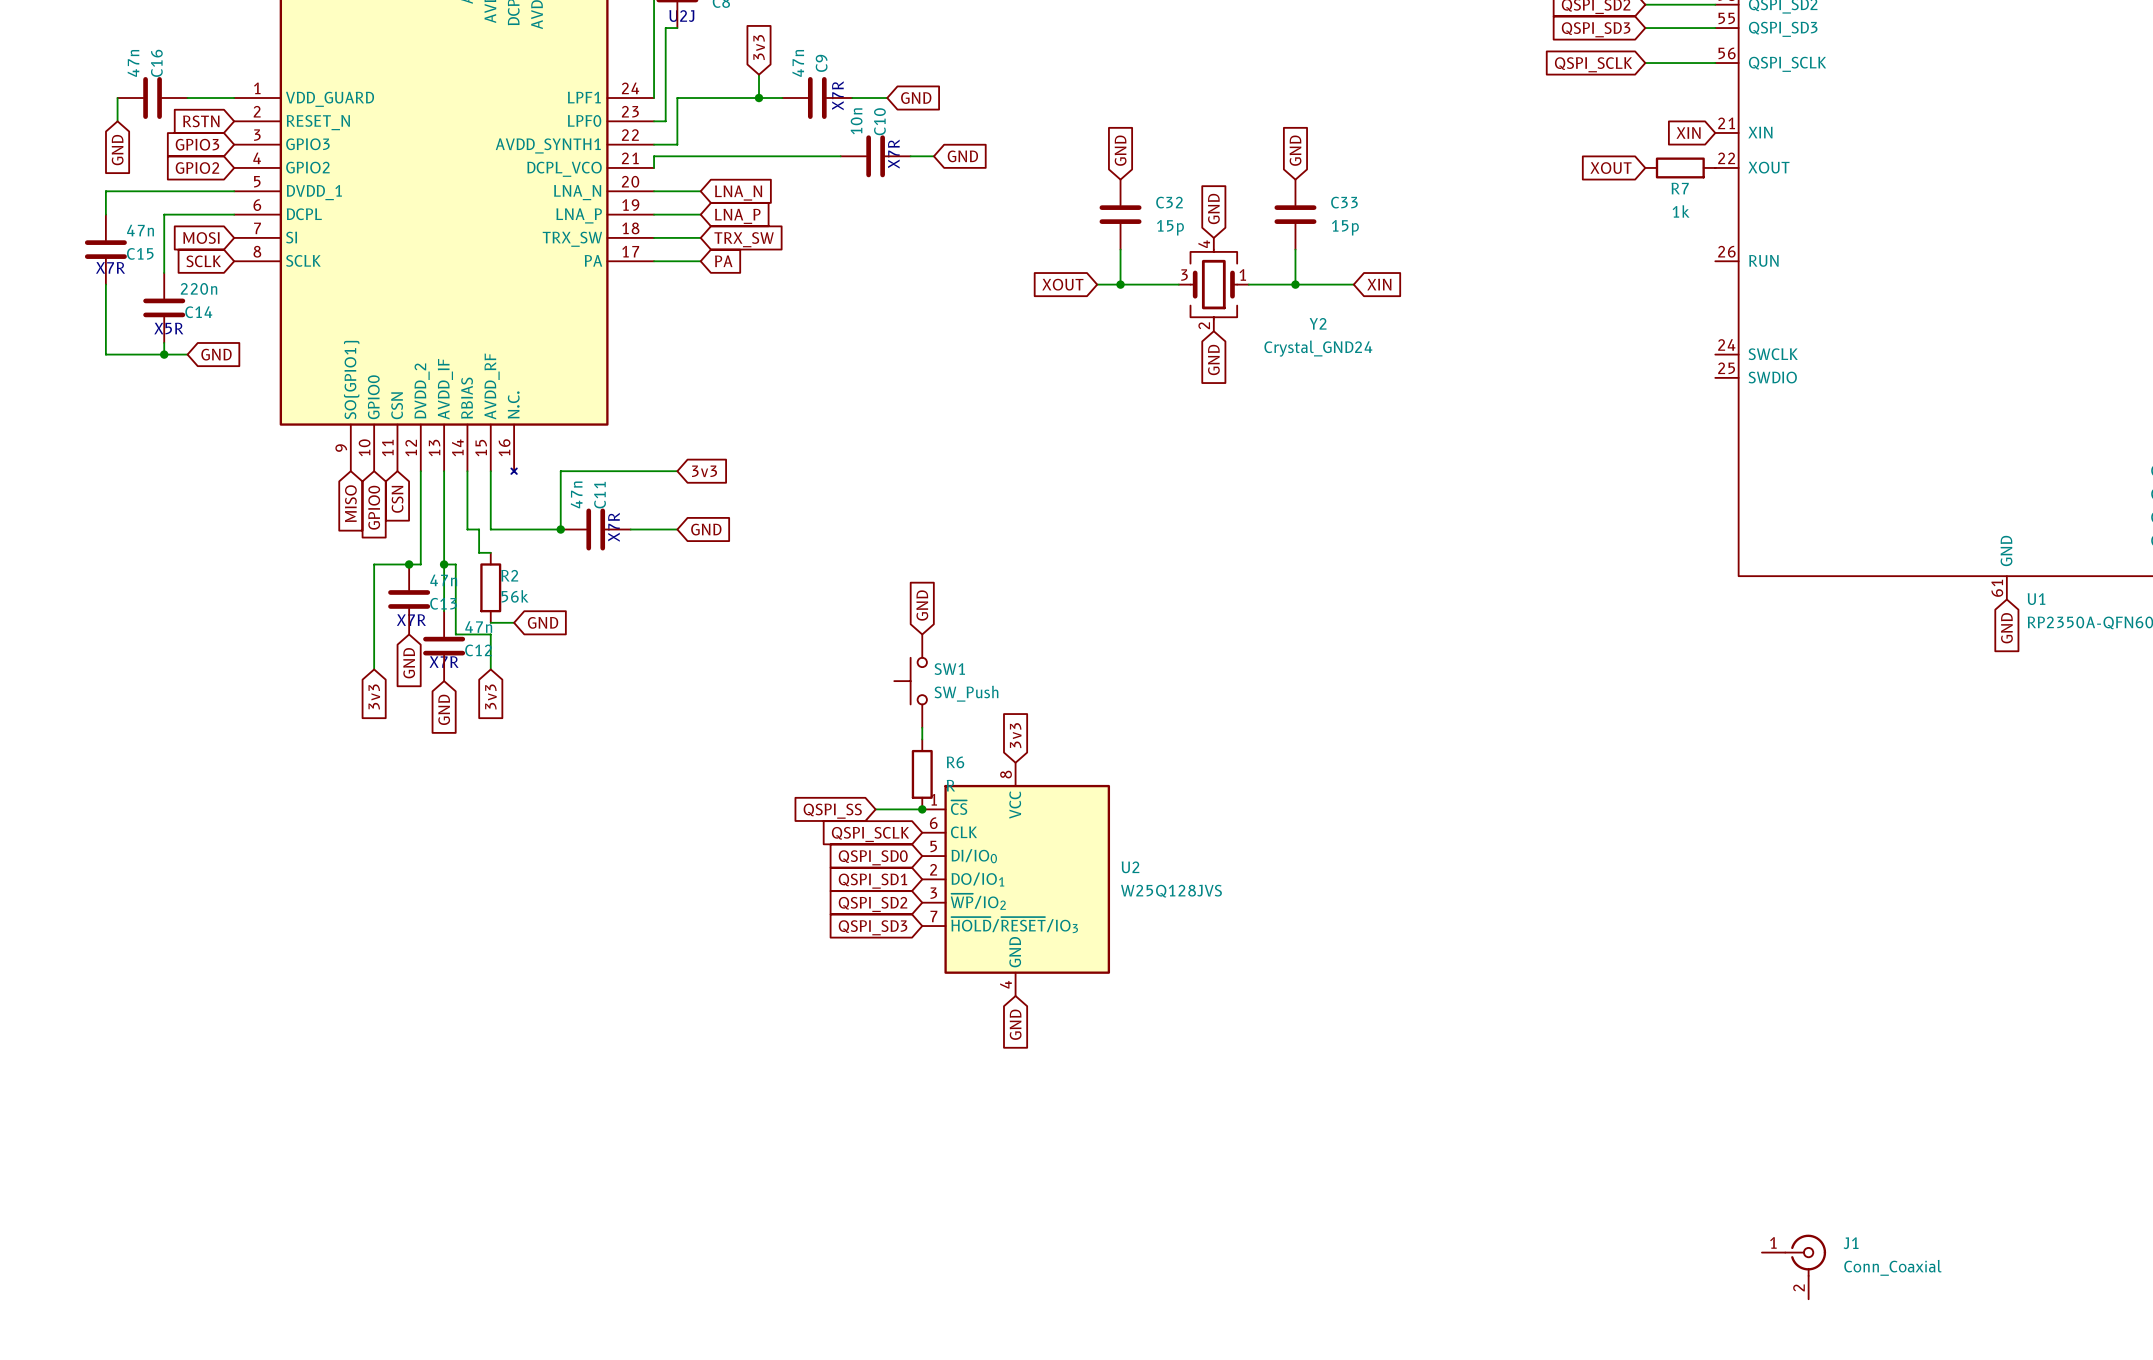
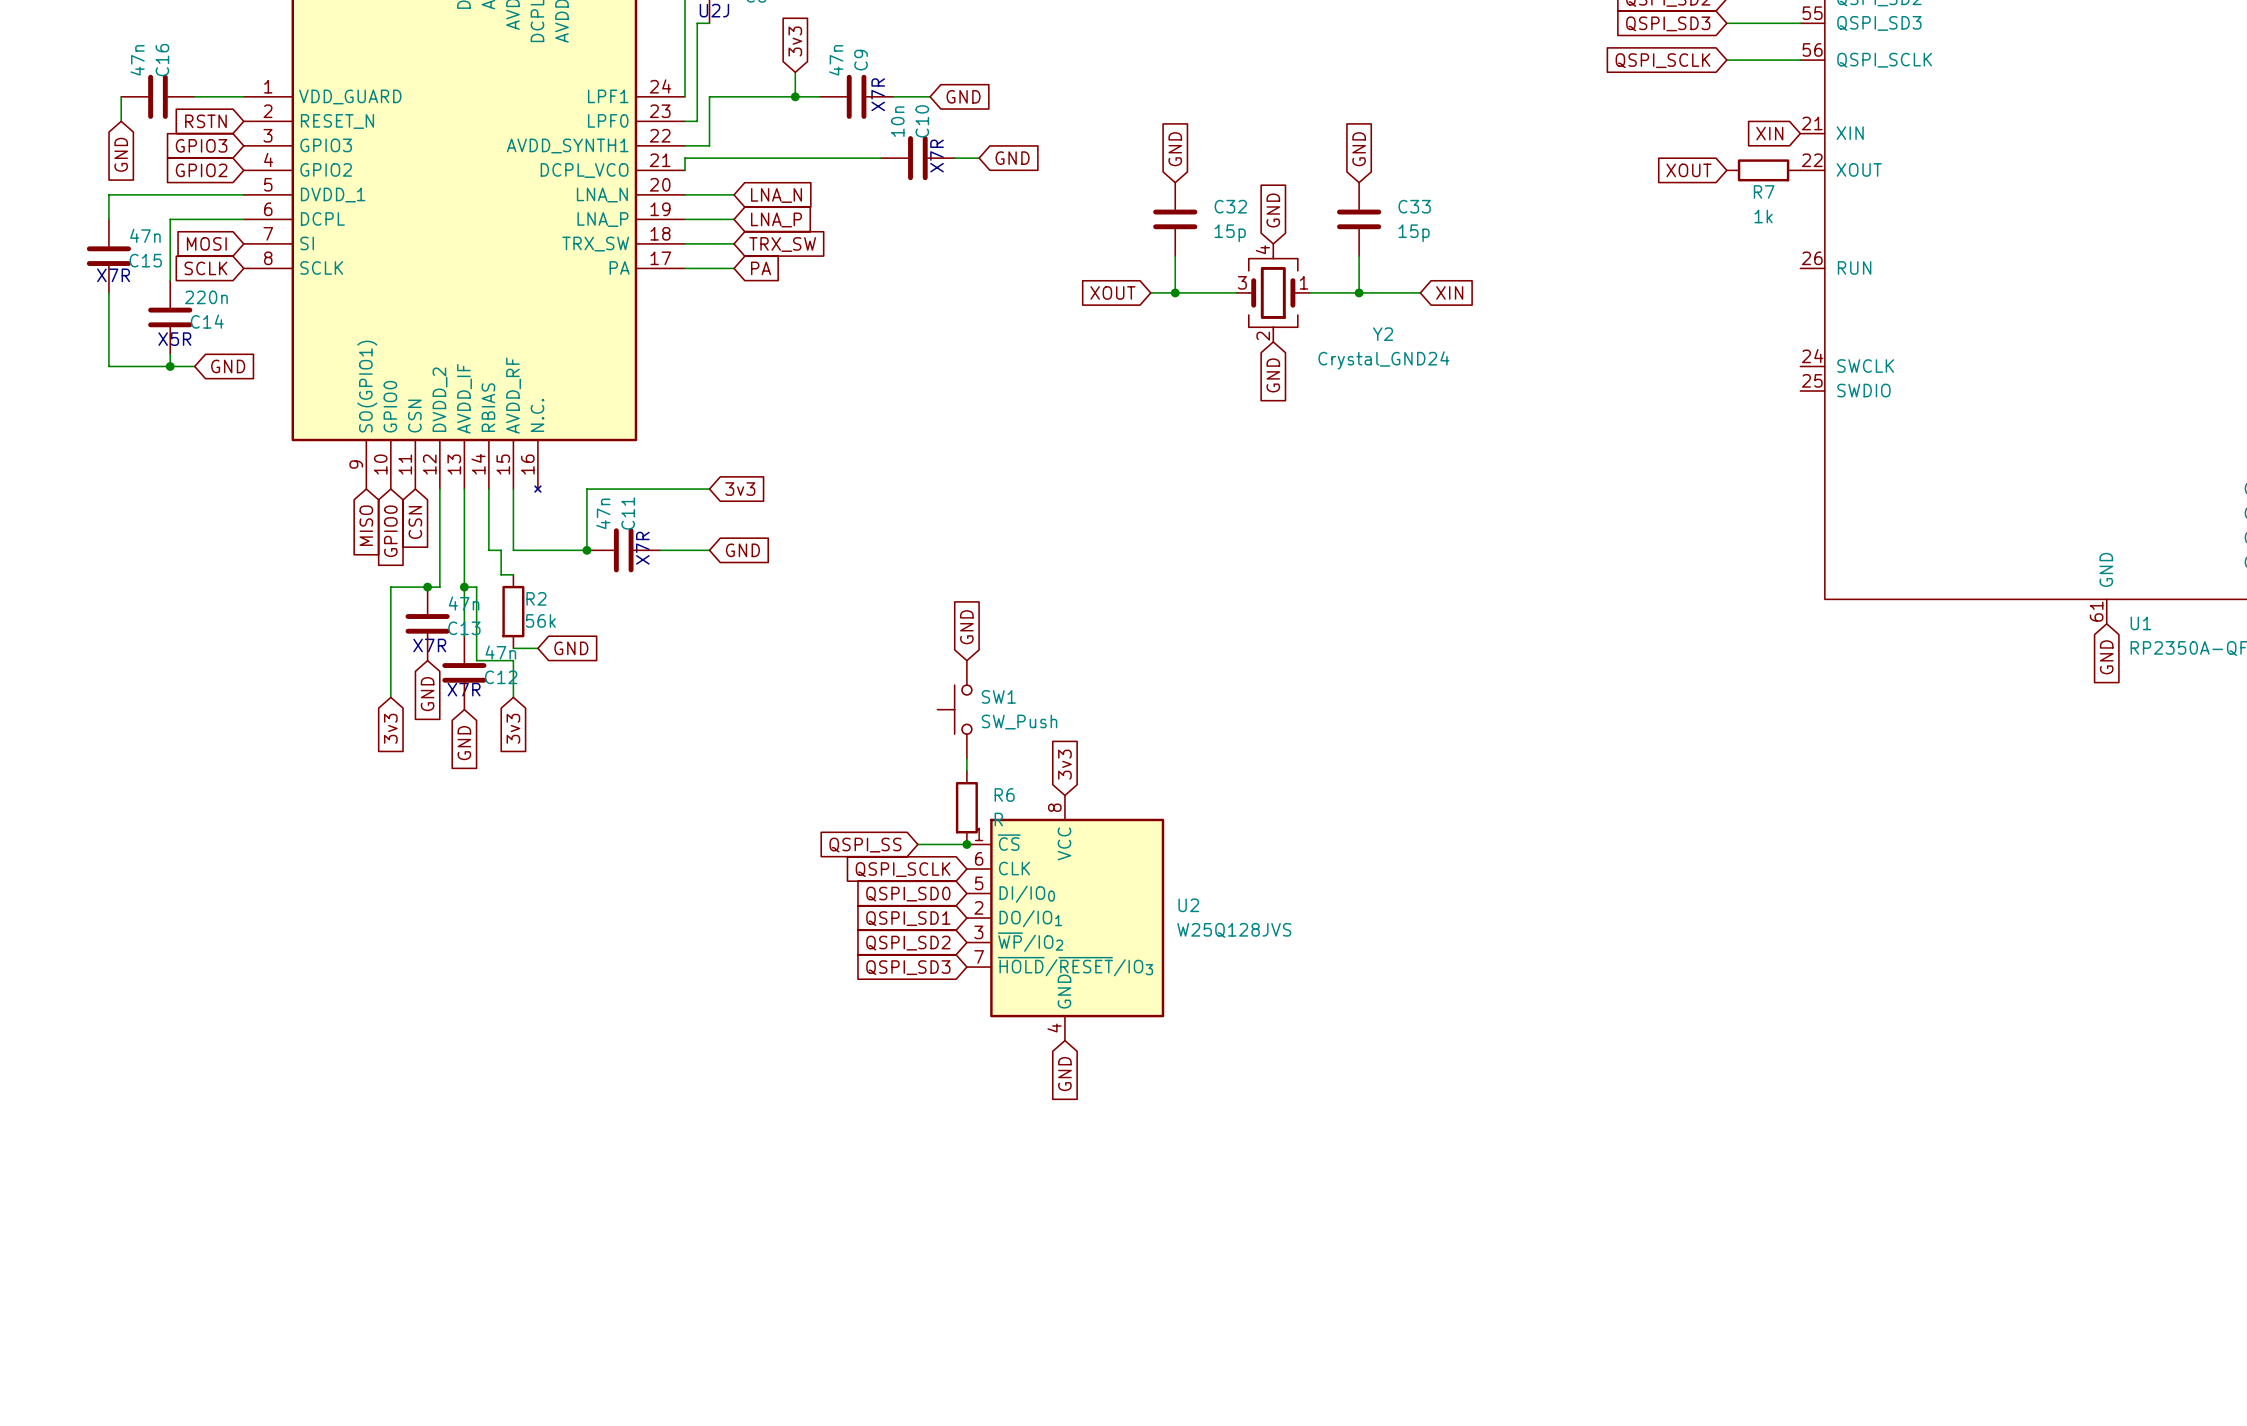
J1: Conn_Coaxial (1794, 1266) -> none

